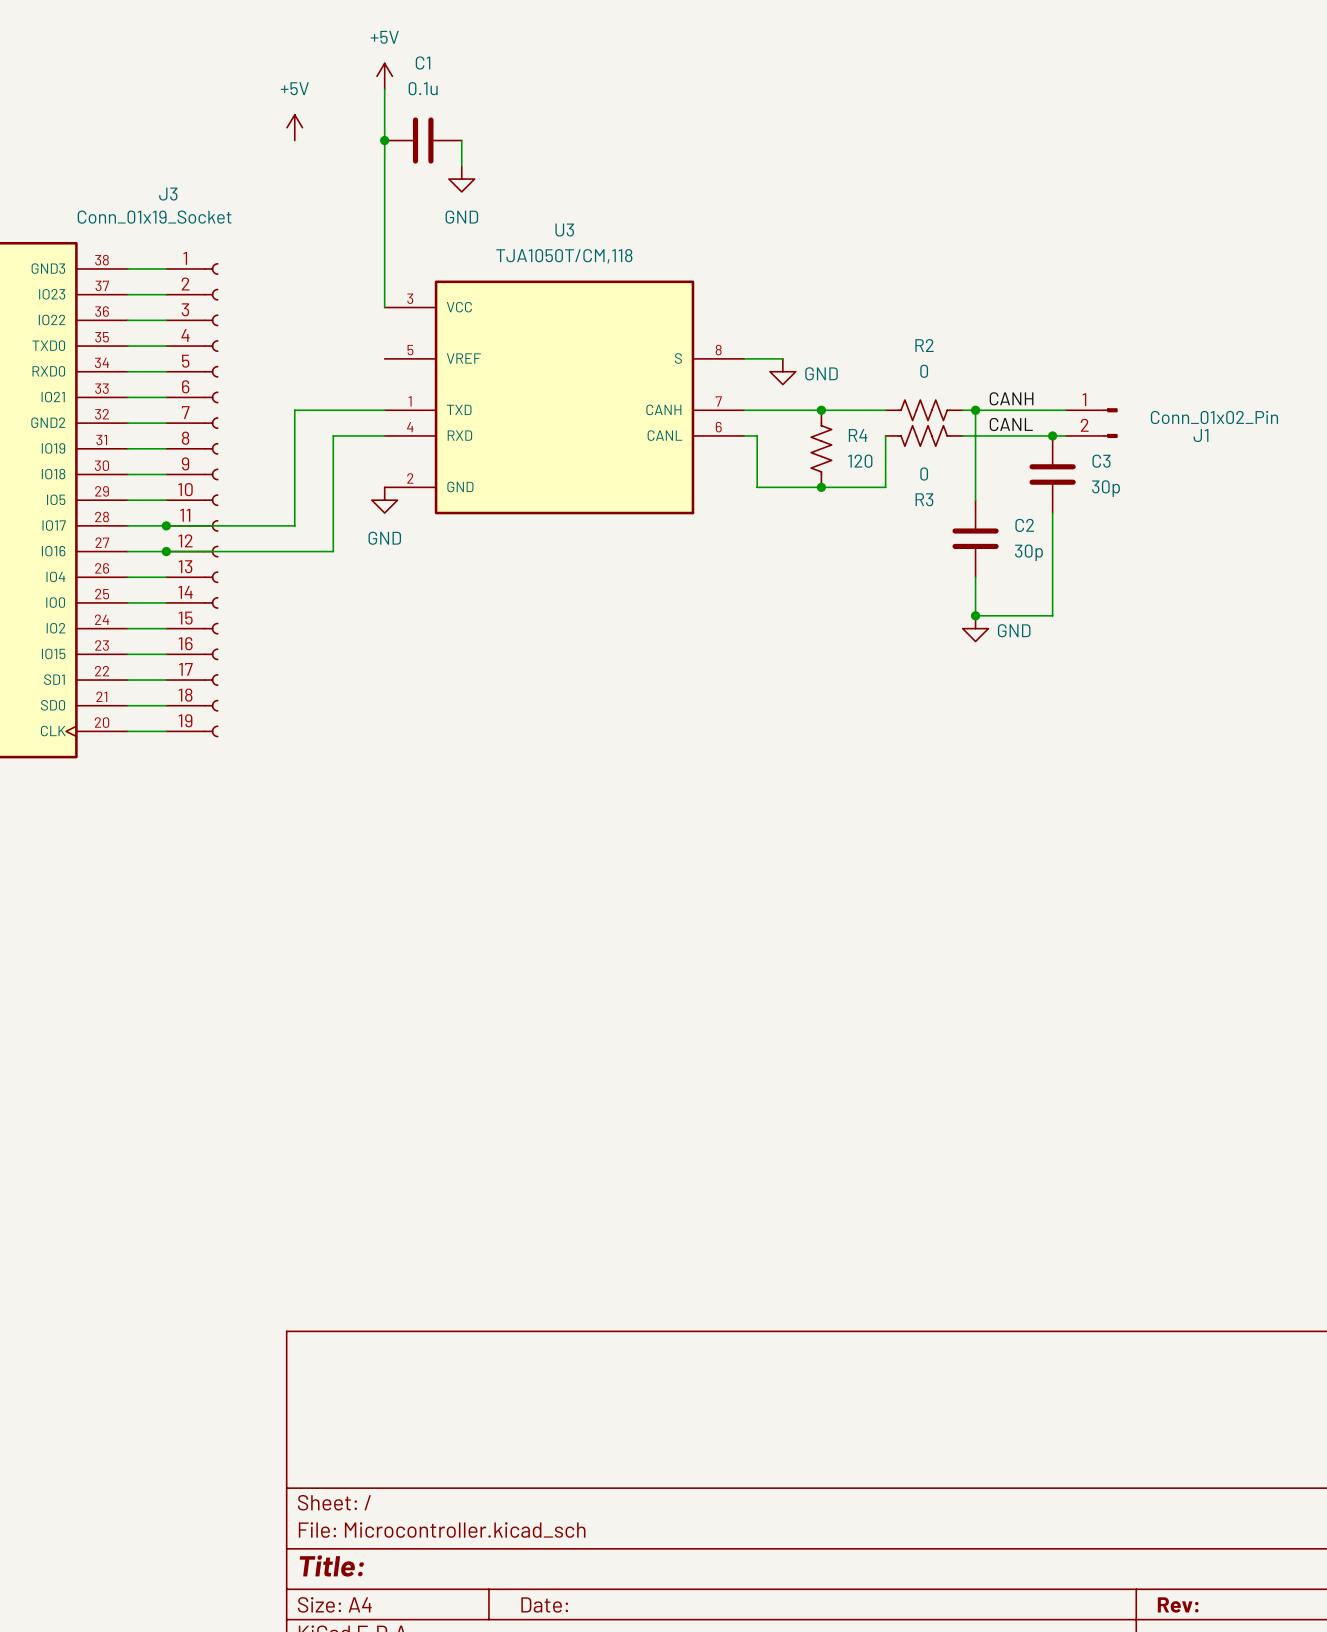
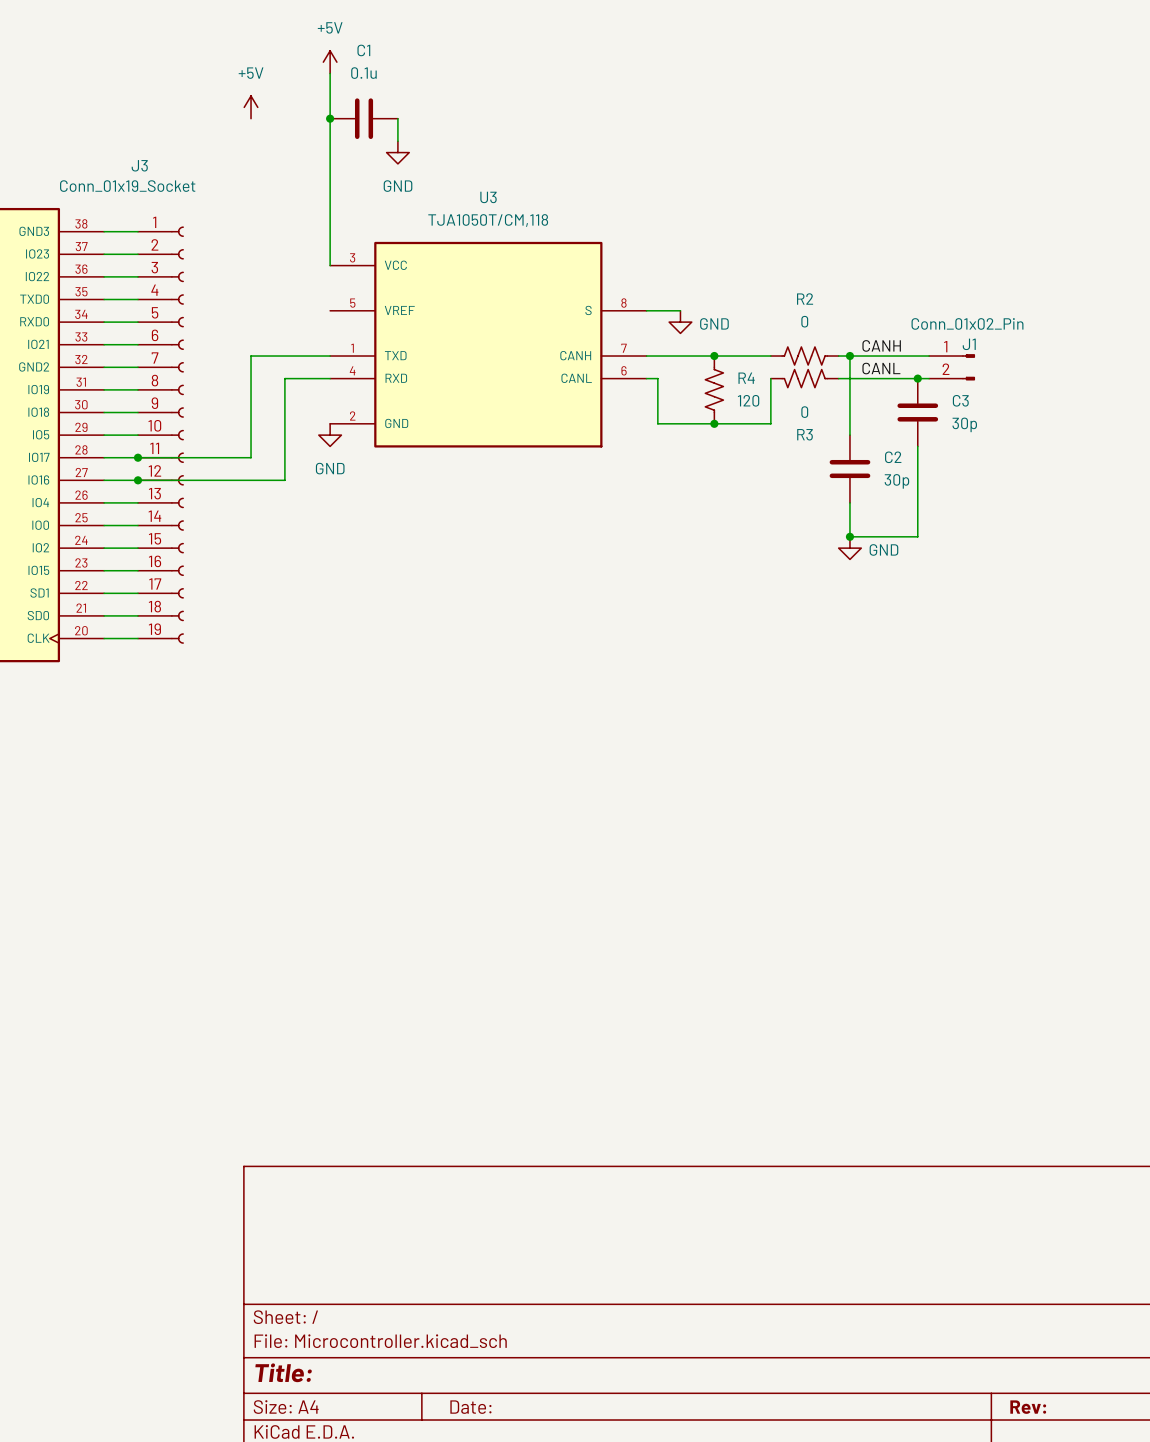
J1 value position: Conn_01x02_Pin (1214, 417) -> Conn_01x02_Pin (967, 323)
J1 name position: J1 (1201, 435) -> J1 (969, 344)

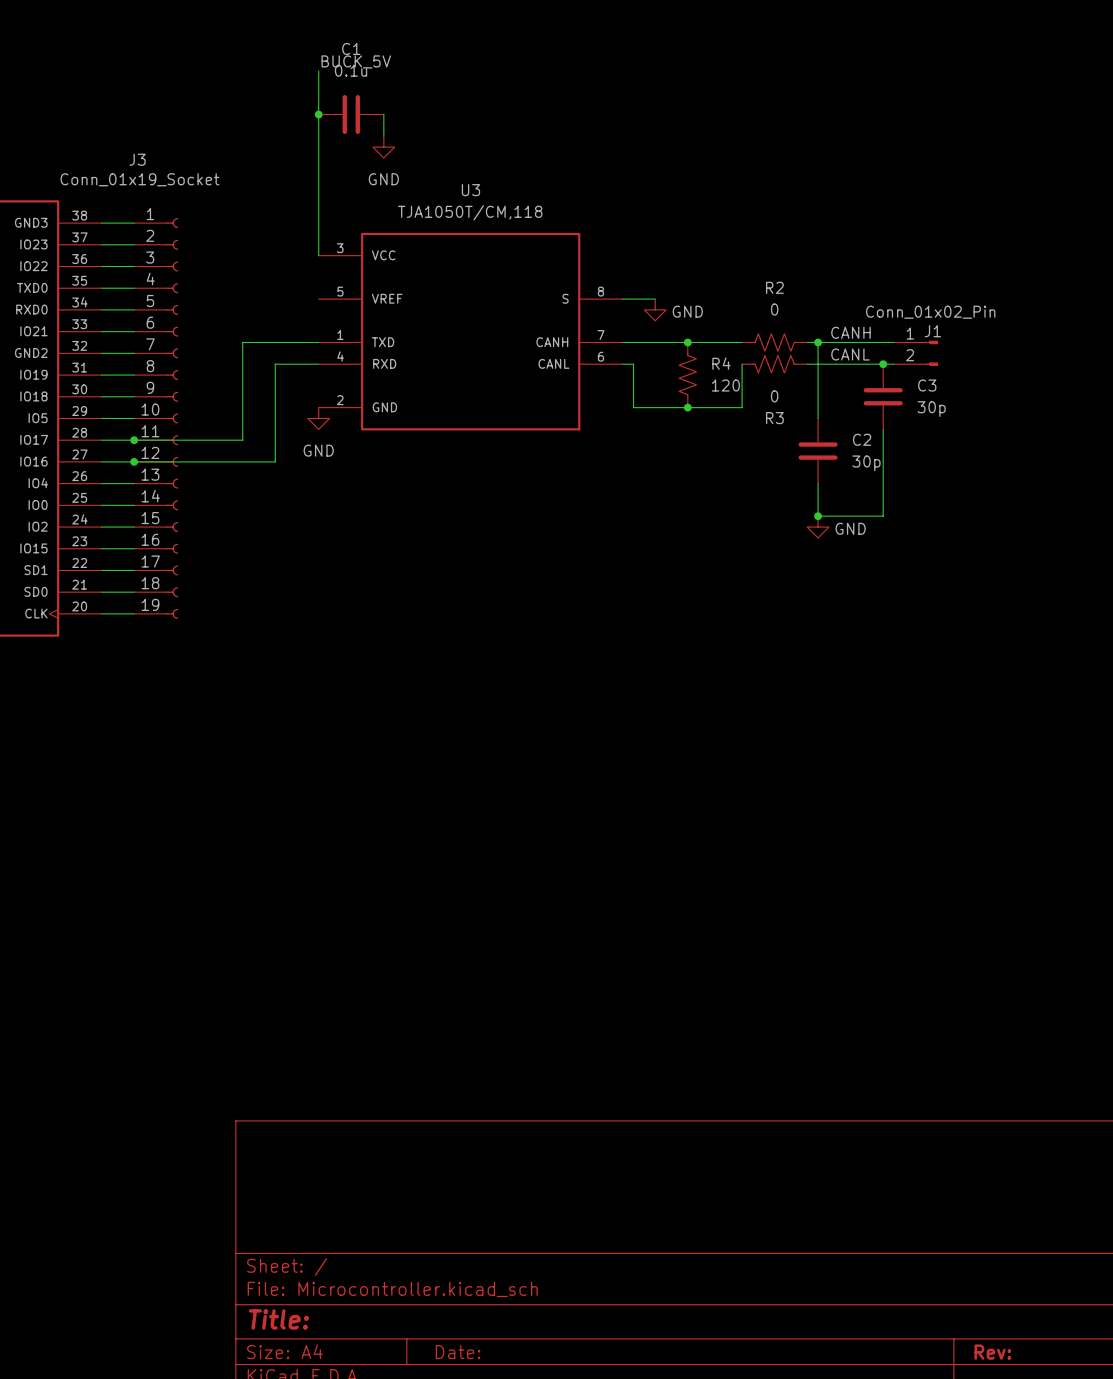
power symbol: +5V (330, 62) -> none
label: none -> BUCK_5V (356, 61)
power symbol: +5V (251, 107) -> none

